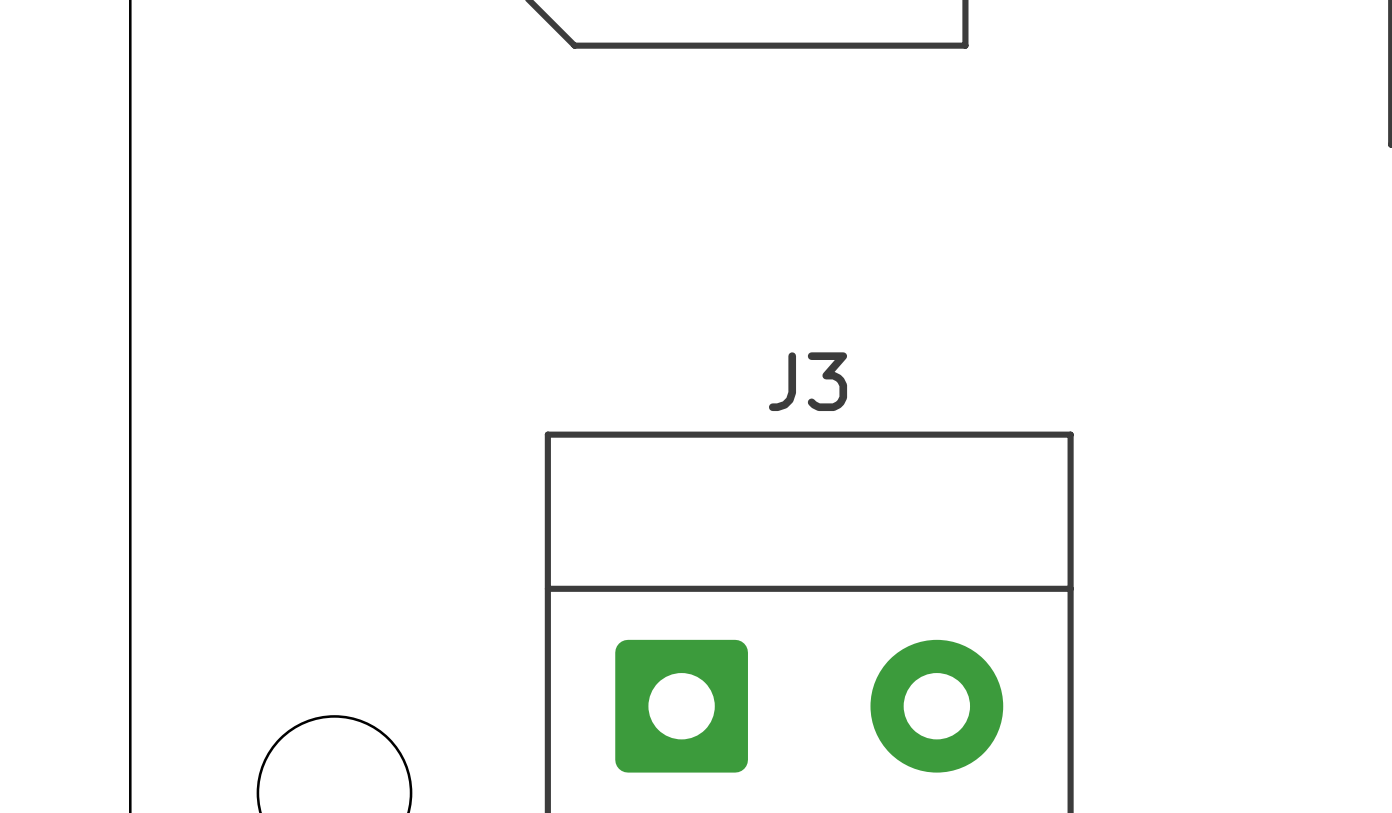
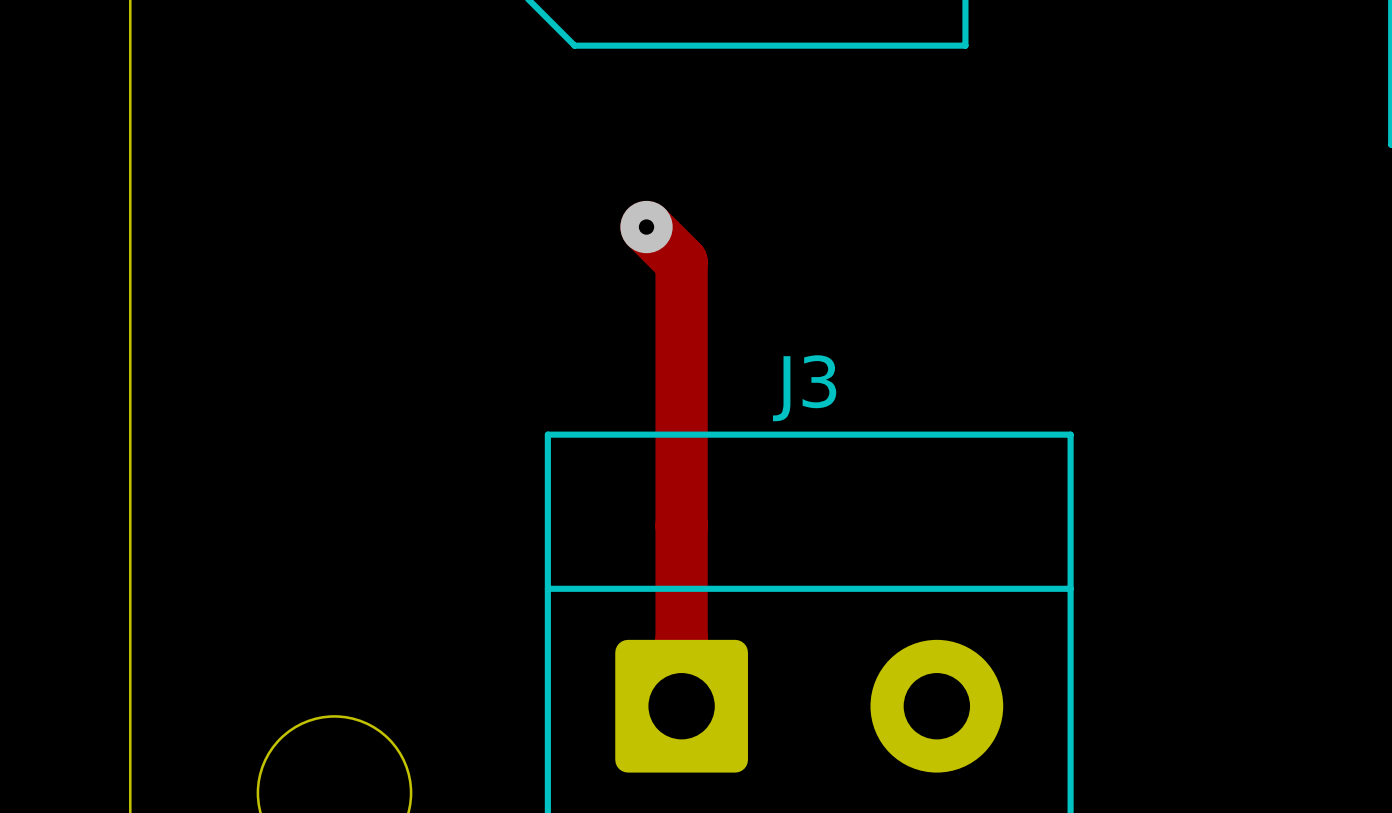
track: none -> (646, 227) (681, 262) (681, 706)
via: none -> (646, 227)

